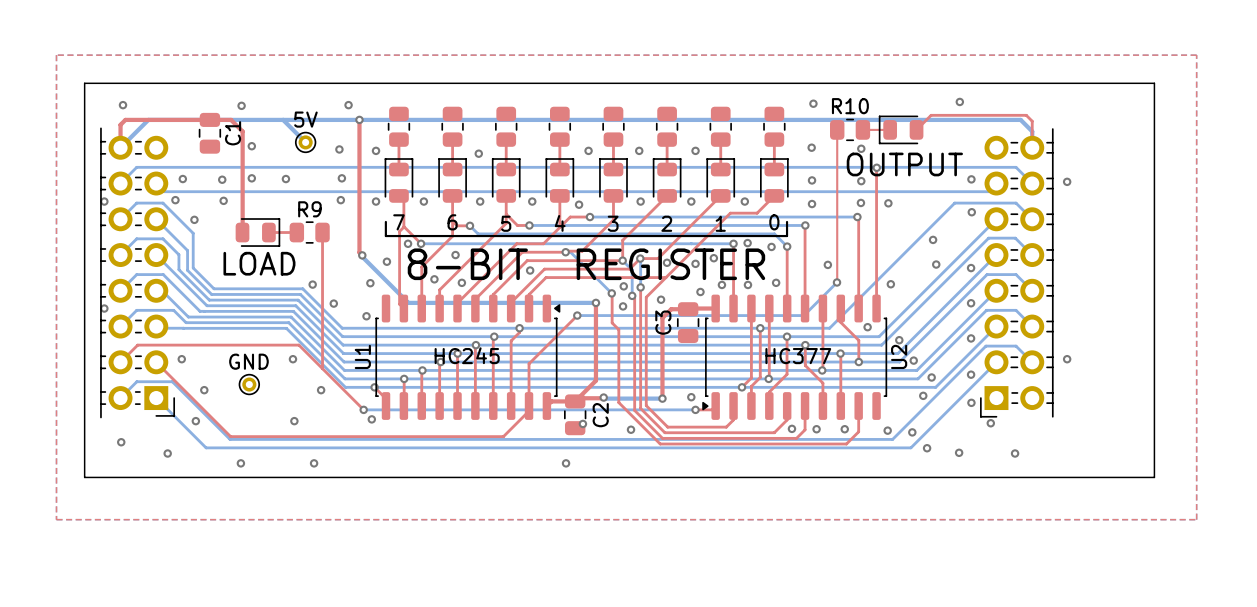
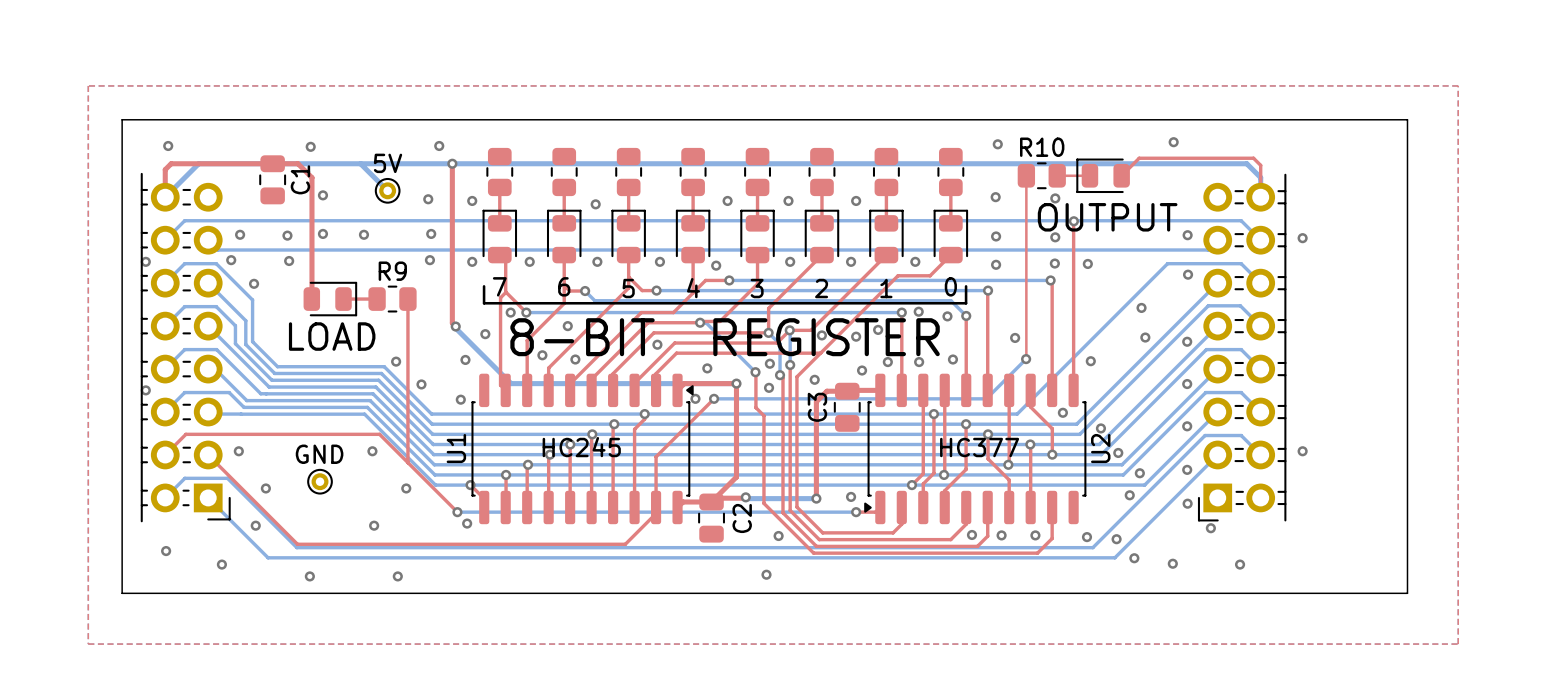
via: none -> (707, 368)
top track: none -> (736, 383) (684, 383) (677, 390)
via: none -> (695, 398)
via: (582, 423) -> none
via: none -> (766, 574)
via: (566, 463) -> none

